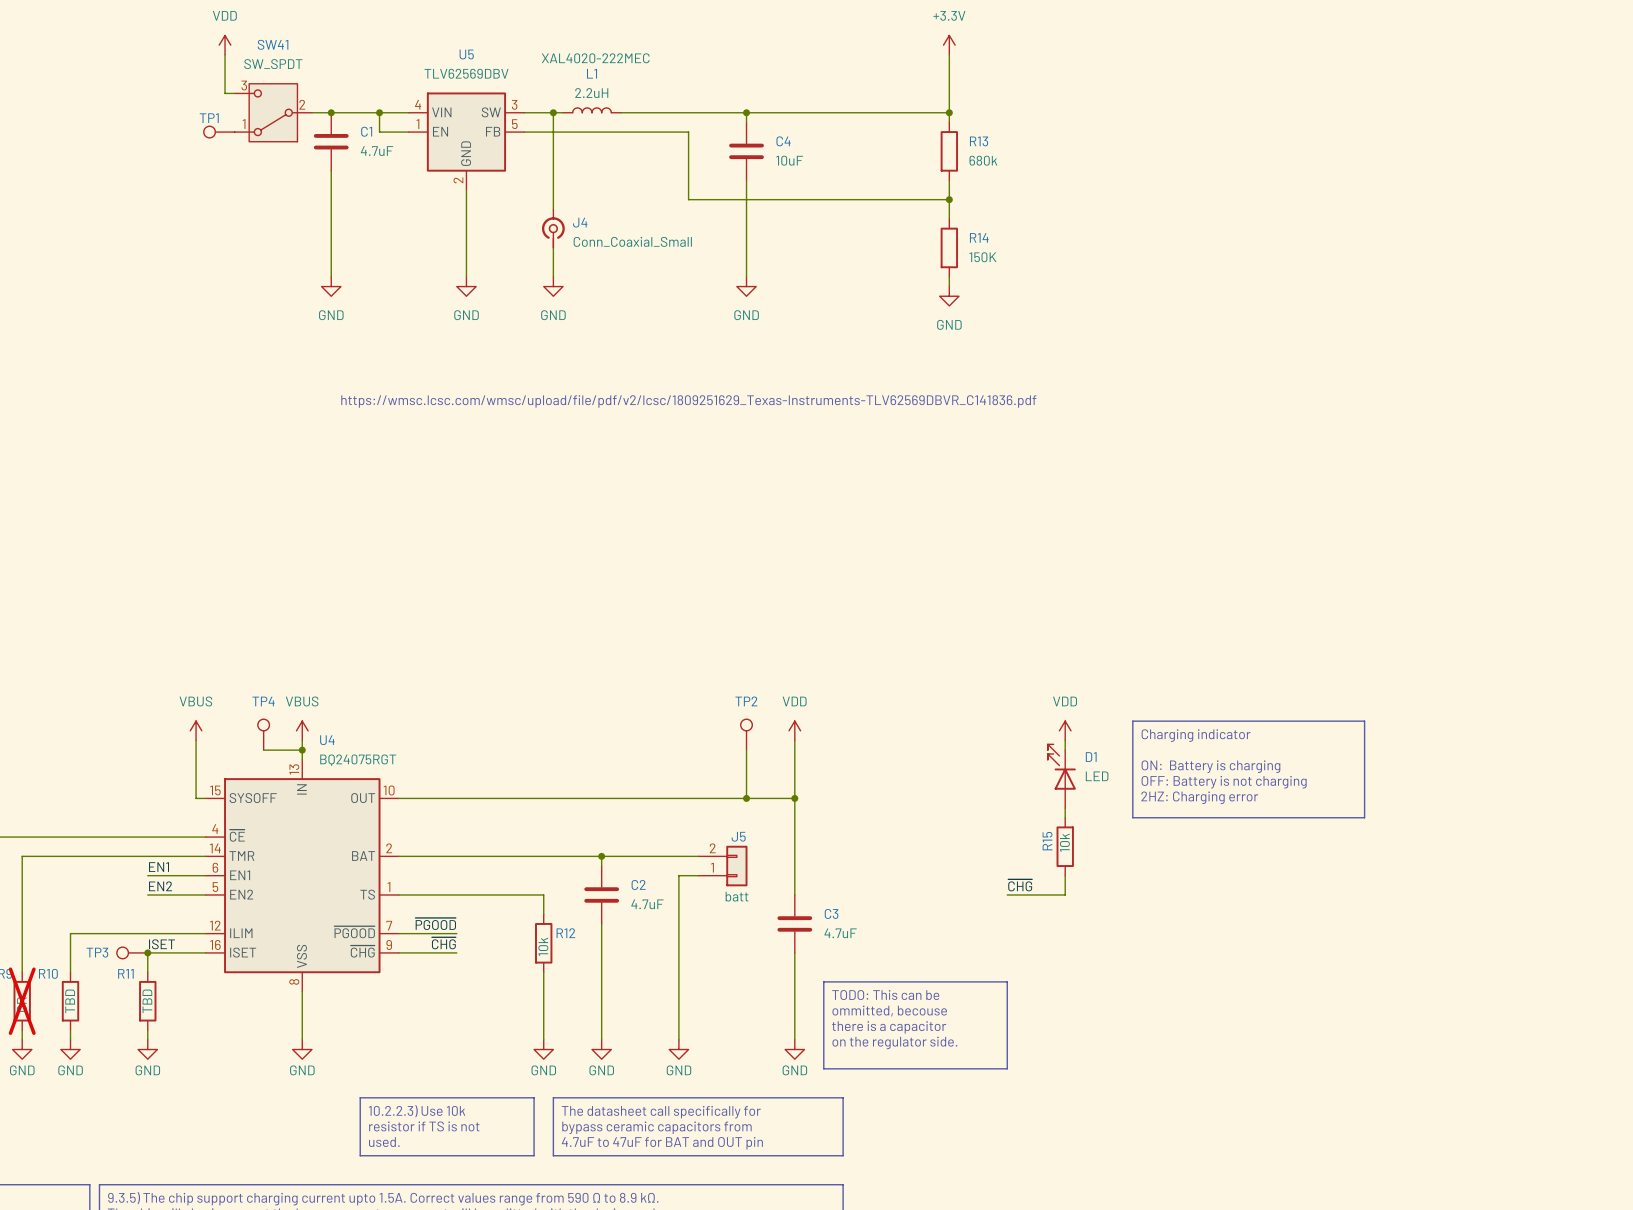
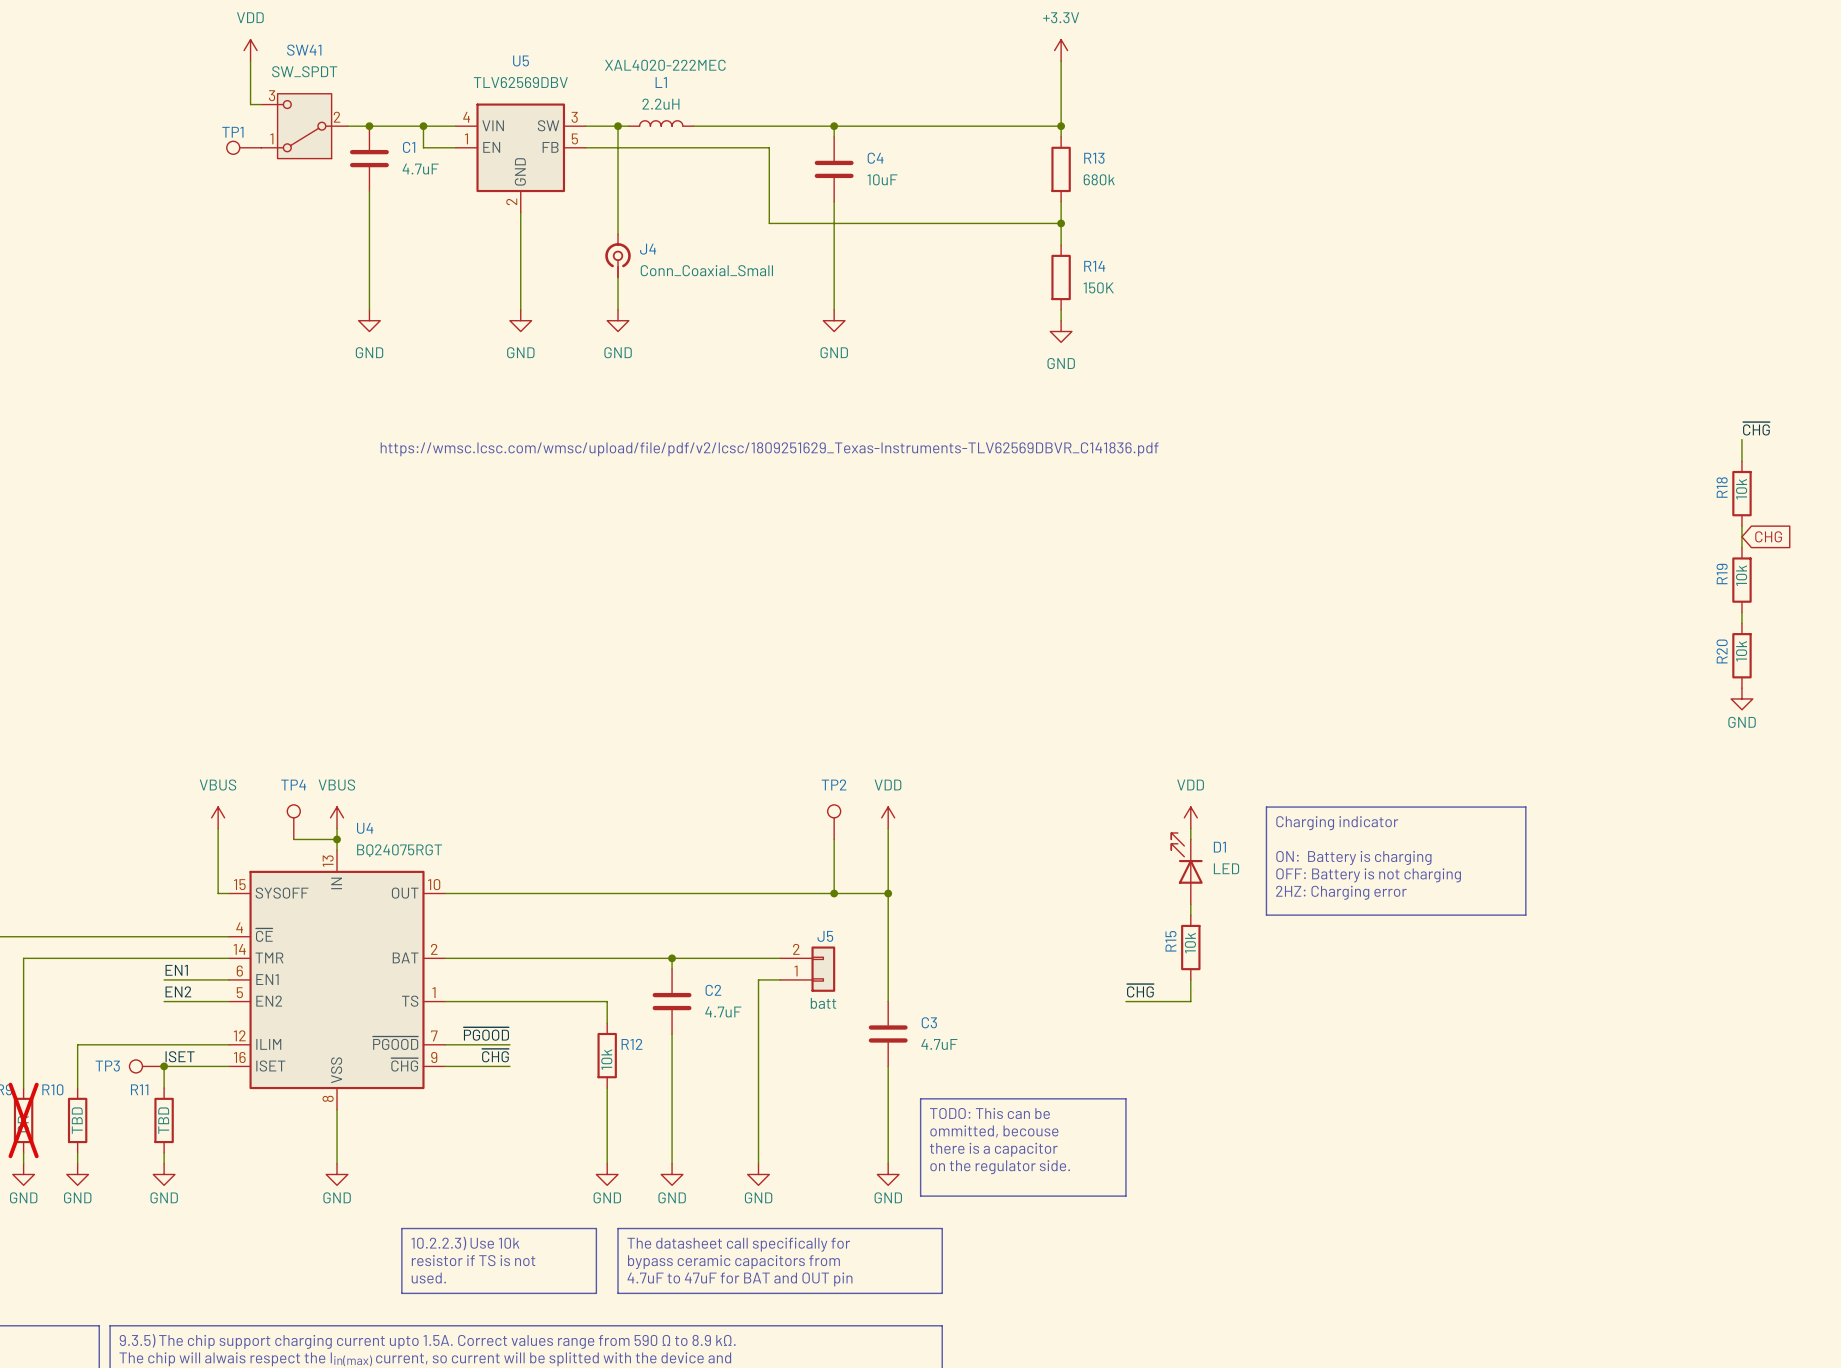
label: none -> ~{CHG} (1756, 428)
wire: none -> (1741, 439) (1741, 461)
R18: none -> 10k (1741, 493)
wire: none -> (1741, 526) (1741, 547)
global label: none -> CHG (1768, 536)
R19: none -> 10k (1741, 580)
wire: none -> (1741, 612) (1741, 623)
R20: none -> 10k (1741, 655)
power symbol: none -> GND (1741, 698)

